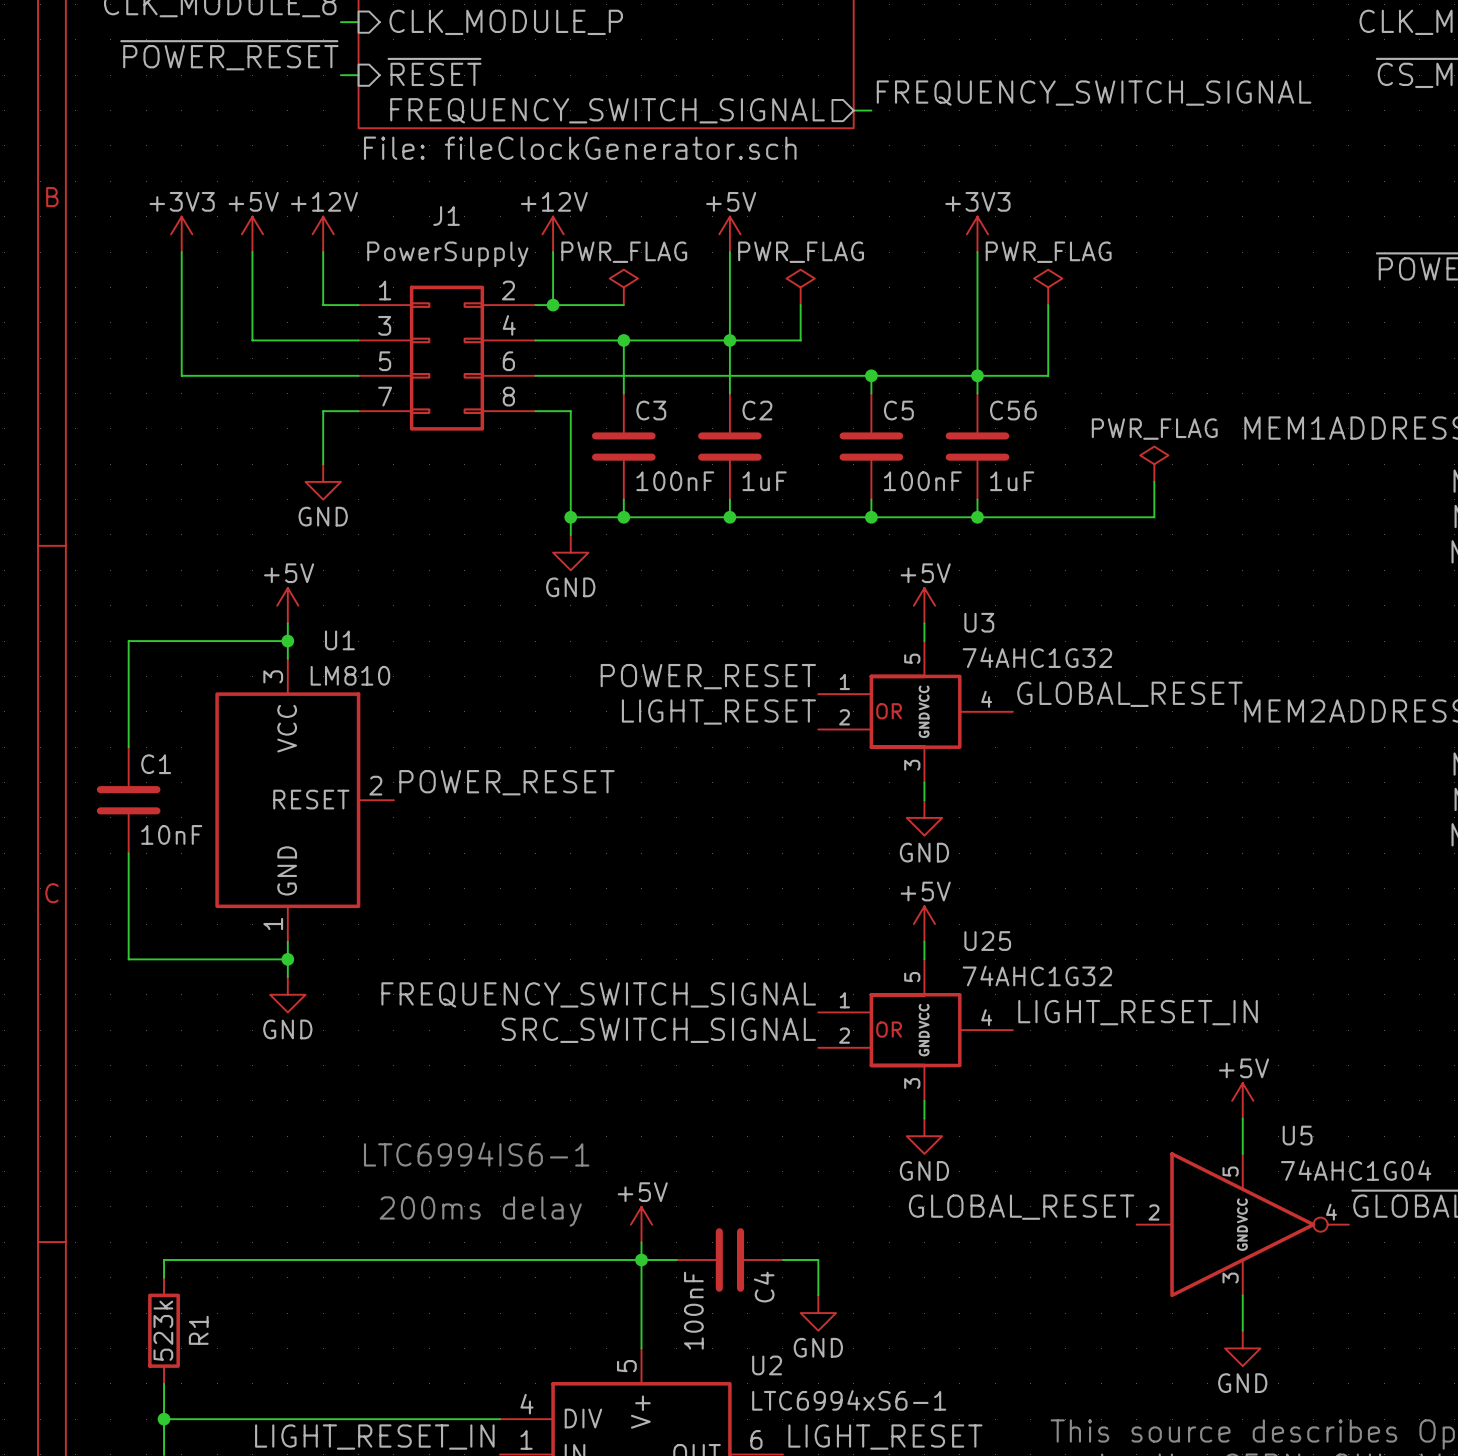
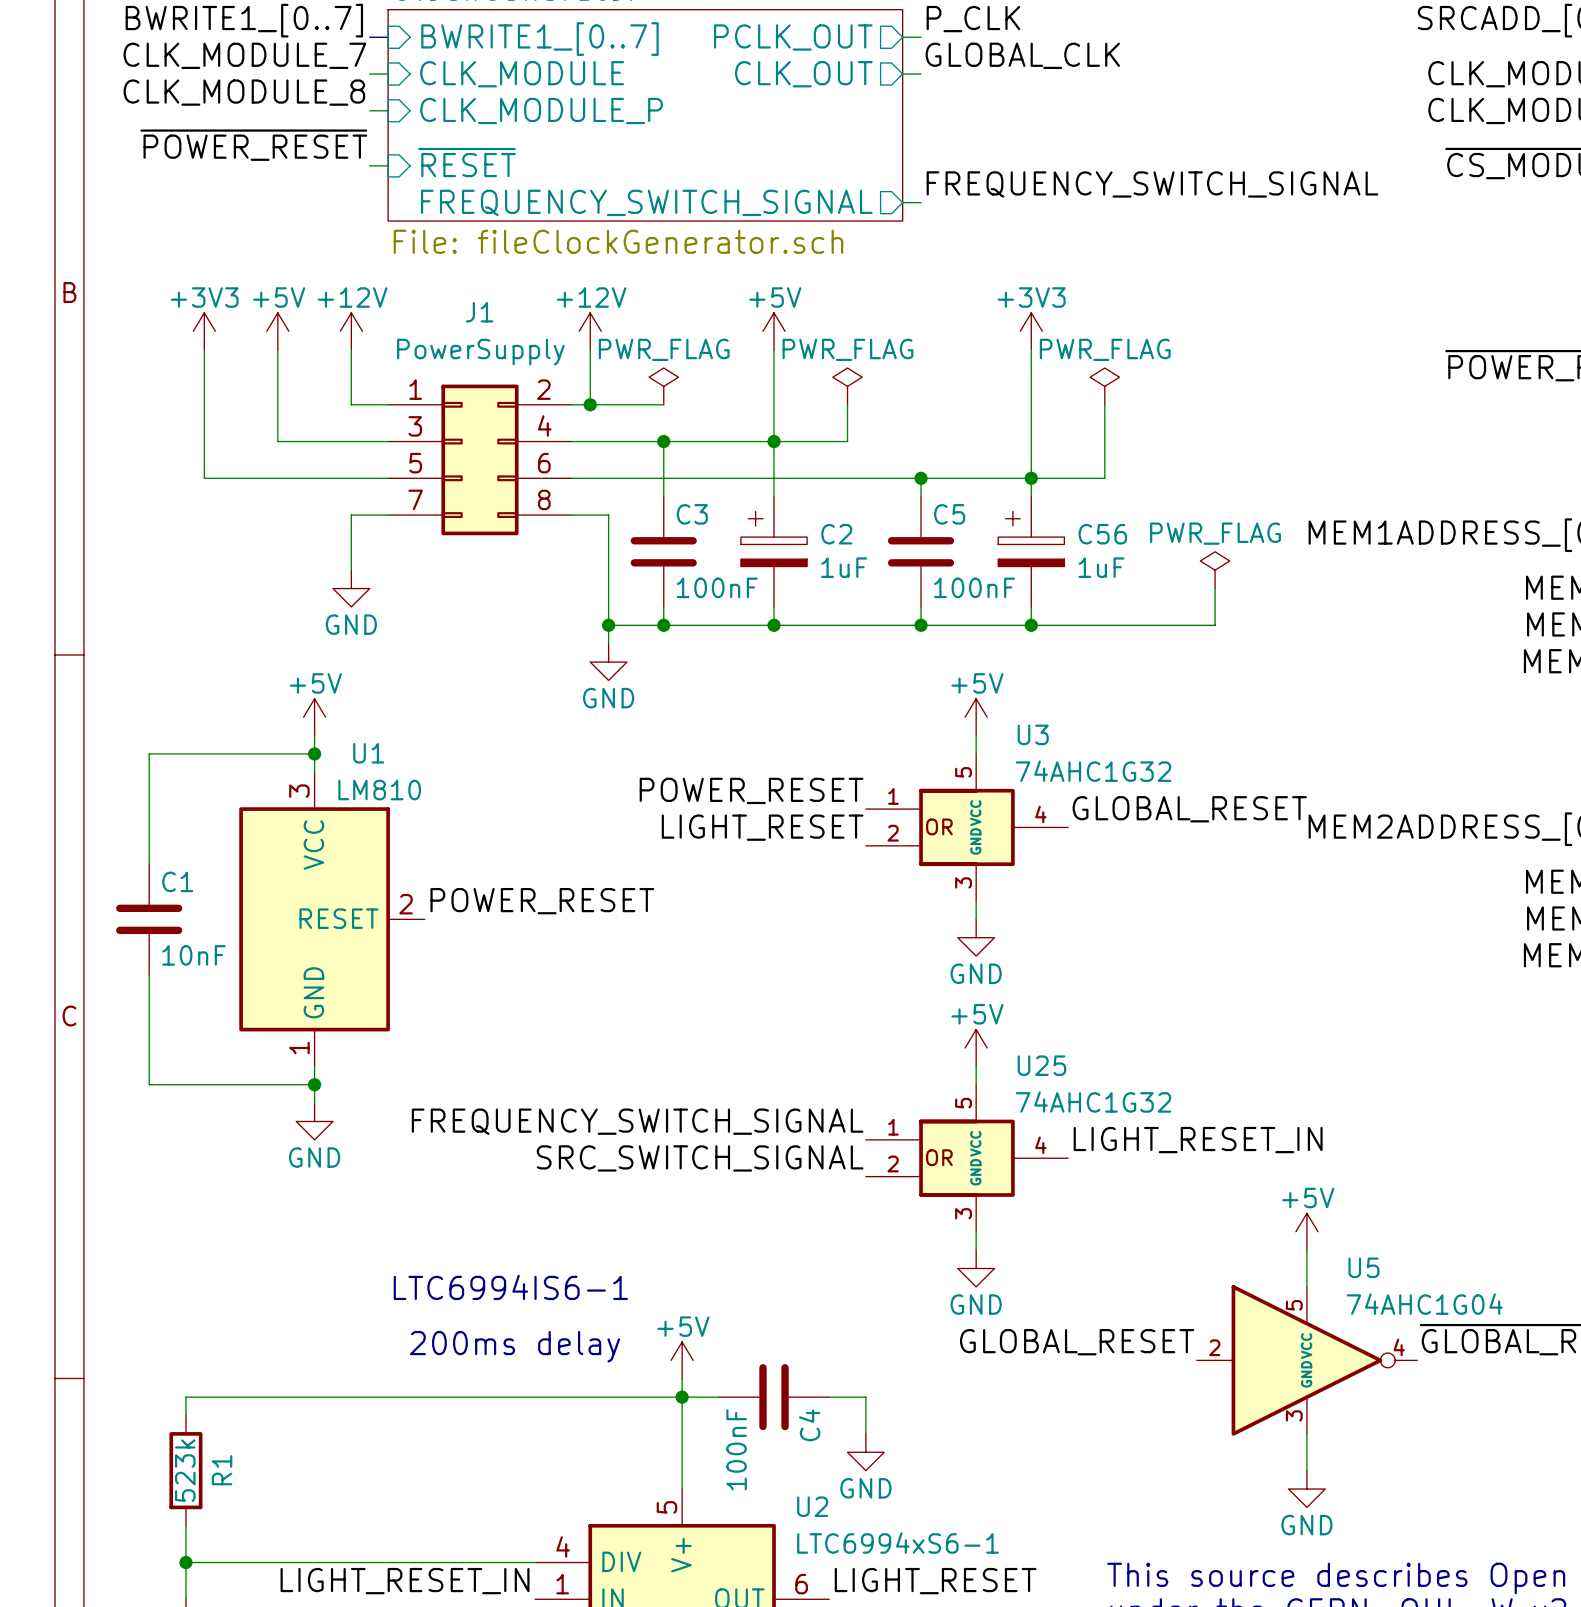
C2 symbol: [698, 393, 762, 500] -> [740, 496, 808, 607]
C56 symbol: [945, 393, 1010, 500] -> [998, 496, 1065, 607]
C2 name position: C2 (757, 410) -> C2 (836, 534)
C56 name position: C56 (1013, 410) -> C56 (1102, 534)
C2 value position: 1uF (764, 481) -> 1uF (844, 567)
C56 value position: 1uF (1012, 481) -> 1uF (1101, 567)

